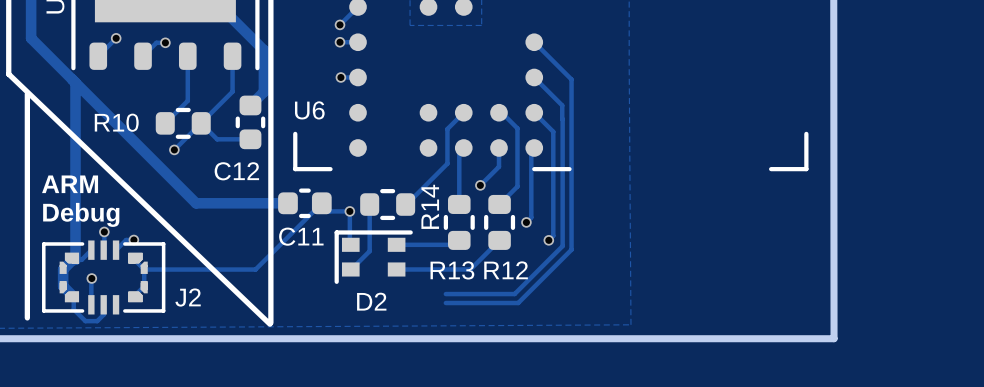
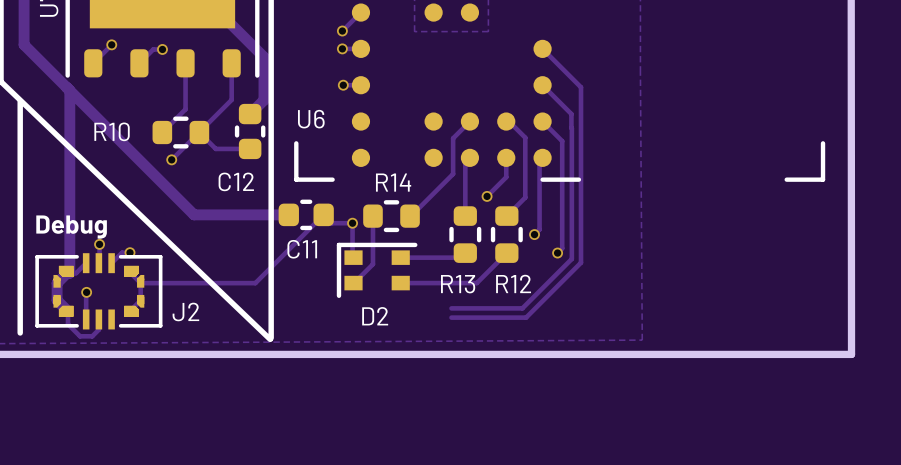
text: ARM (70, 184) -> none
R14 name rotation: 0° (430, 206) -> 90° clockwise (393, 182)

